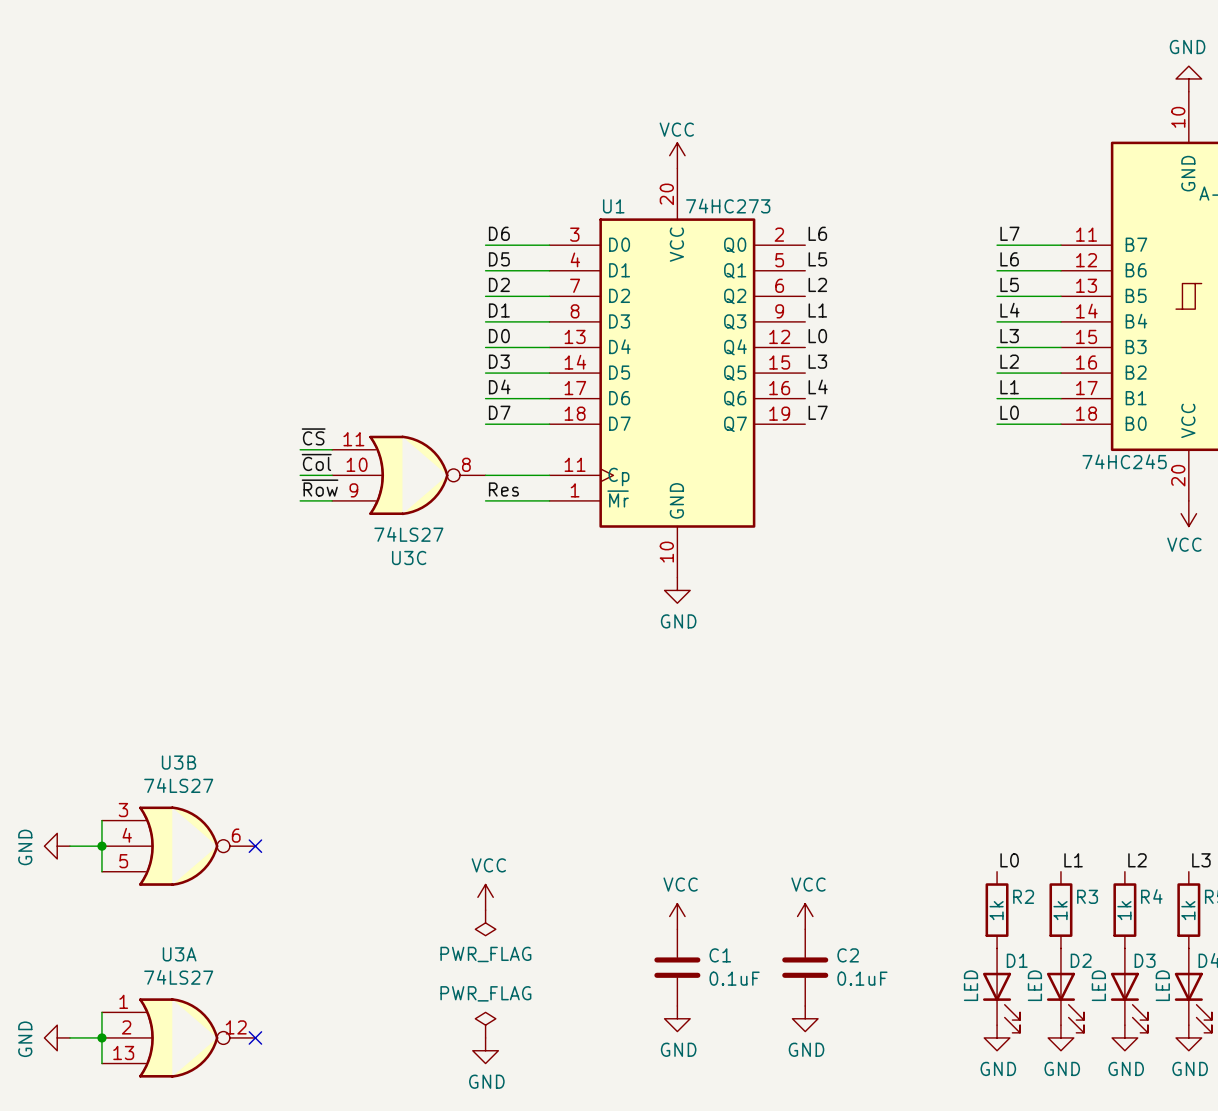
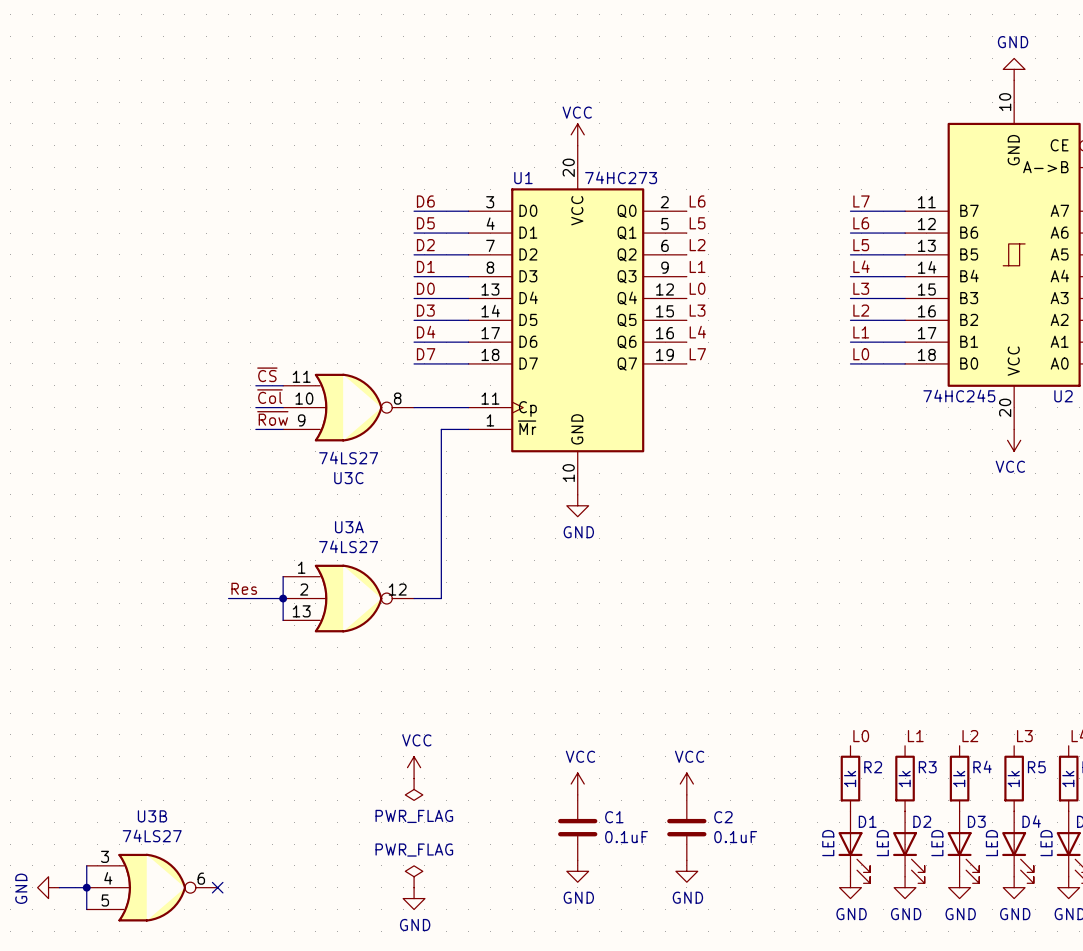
label: Res (503, 489) -> none
wire: (485, 500) (517, 500) -> (414, 598) (441, 598) (441, 429)
wire: none -> (283, 576) (283, 620)
label: none -> Res (244, 588)
wire: none -> (228, 598) (283, 598)
junction: none -> (283, 598)
wire: (101, 820) (101, 871) -> none
power symbol: GND (57, 846) -> none
wire: (70, 846) (101, 846) -> none
junction: (101, 846) -> none
U3B position: (178, 846) -> (152, 887)
no-connect mark: (255, 846) -> none
U3A position: (178, 1037) -> (348, 598)

